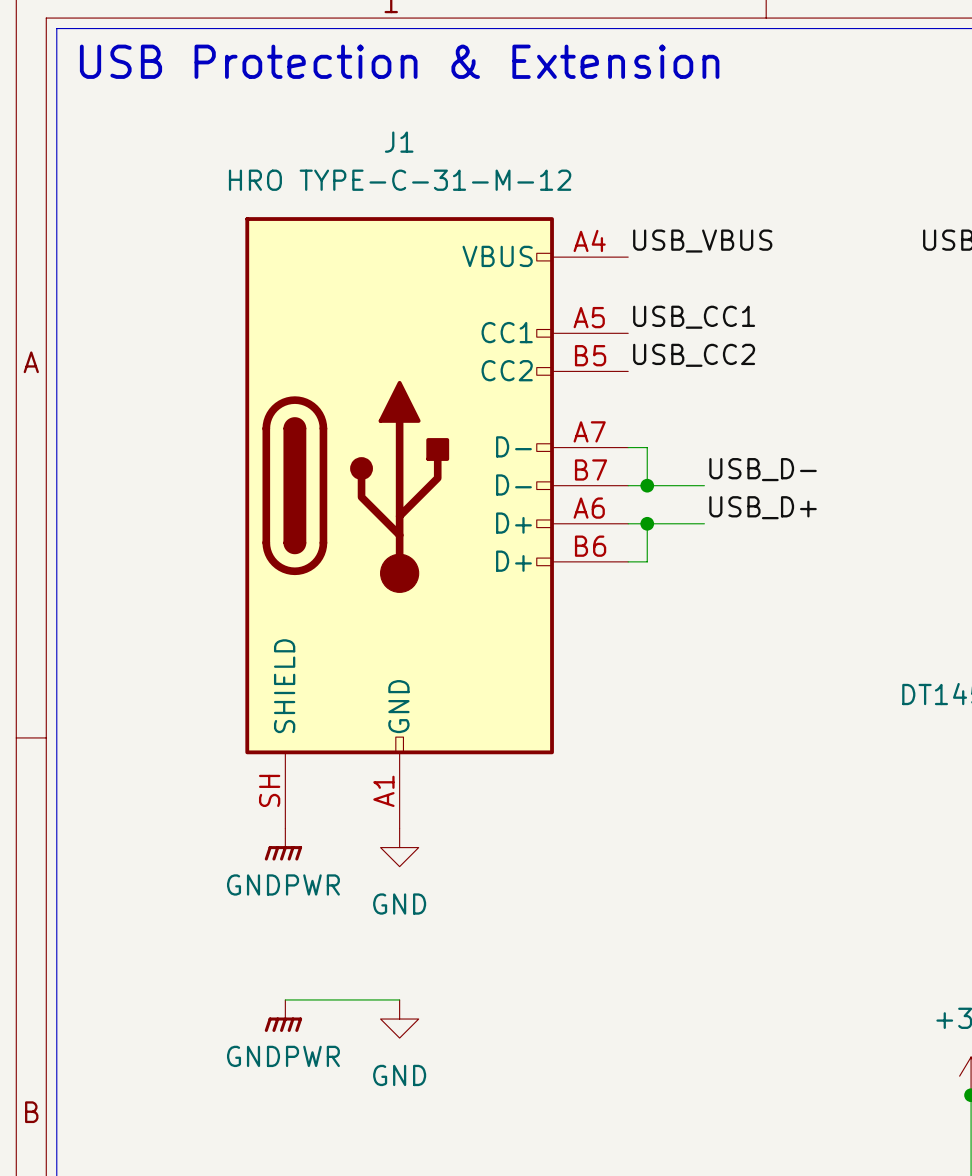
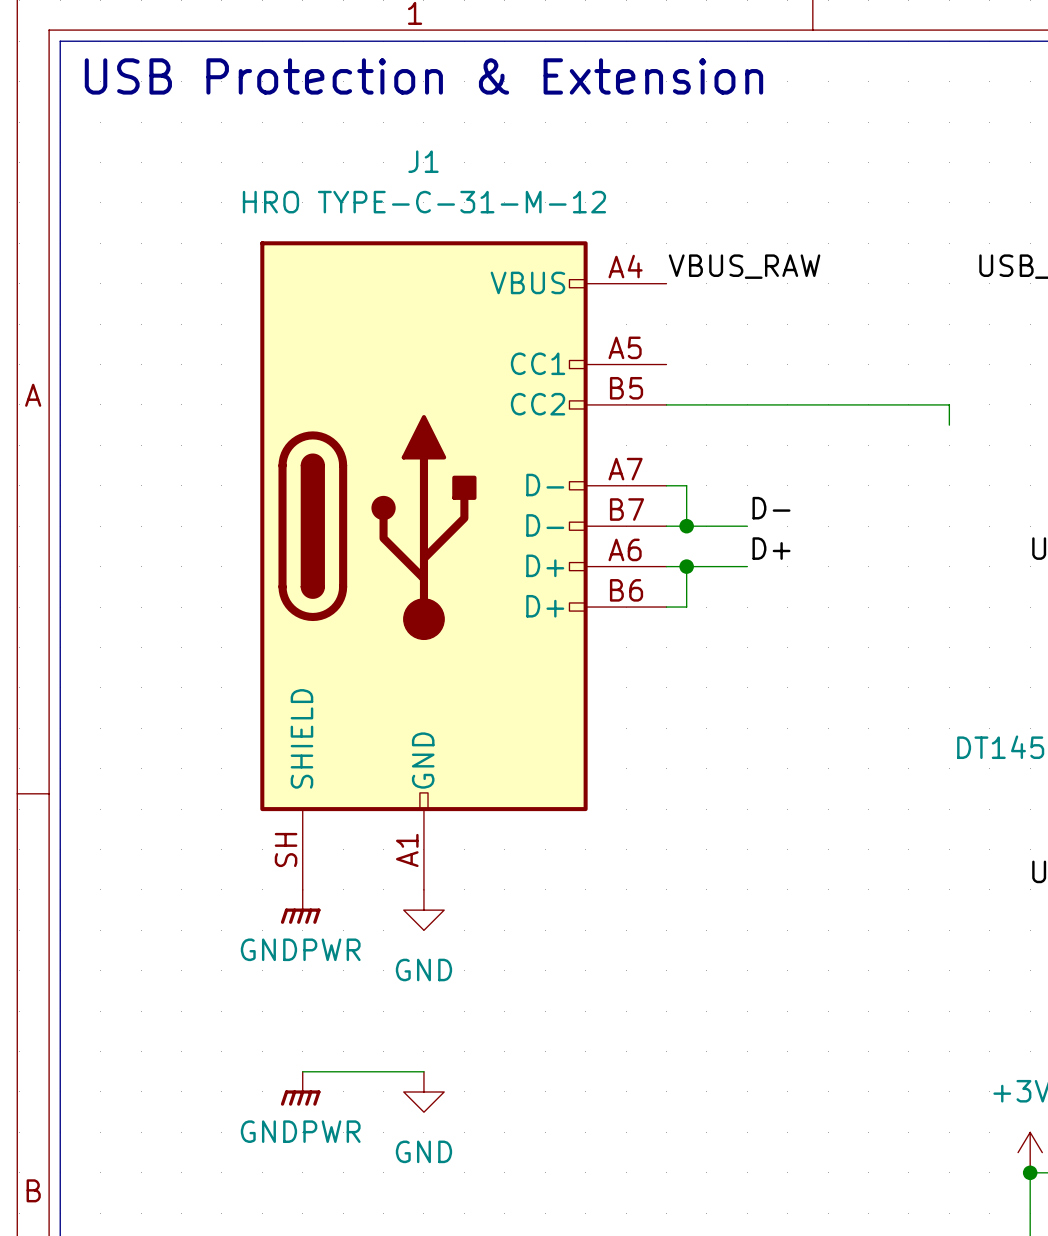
label: USB_VBUS (702, 241) -> VBUS_RAW (744, 266)
label: USB_CC1 (694, 317) -> none
label: USB_CC2 (694, 355) -> none
wire: none -> (666, 404) (949, 404) (949, 425)
label: USB_D- (763, 469) -> D- (771, 508)
label: USB_D+ (763, 507) -> D+ (771, 548)

